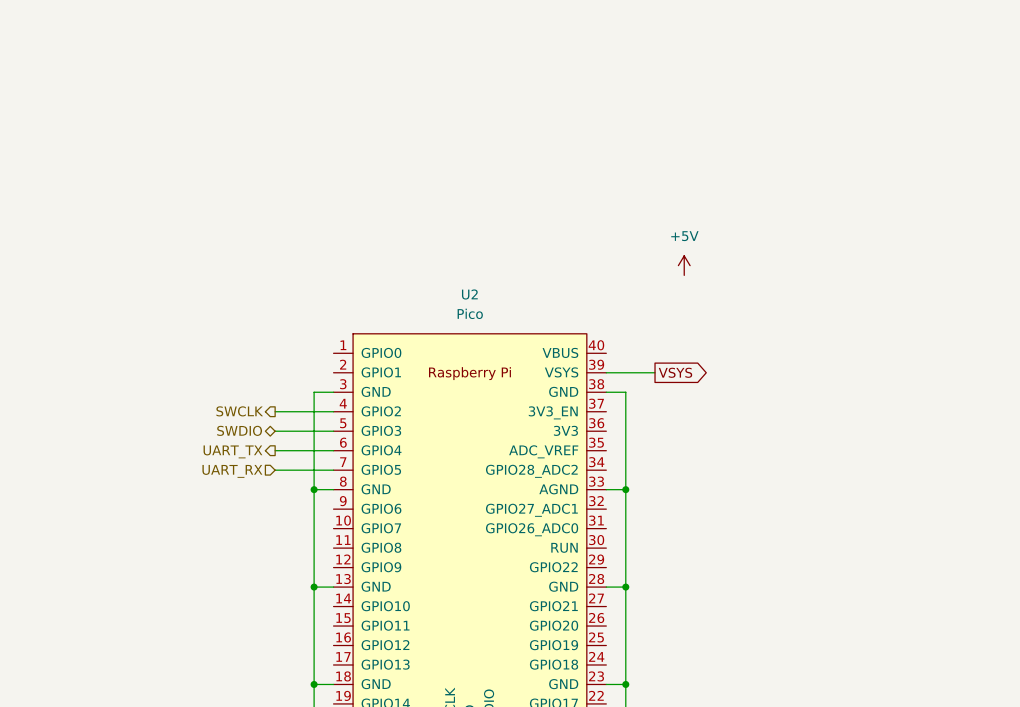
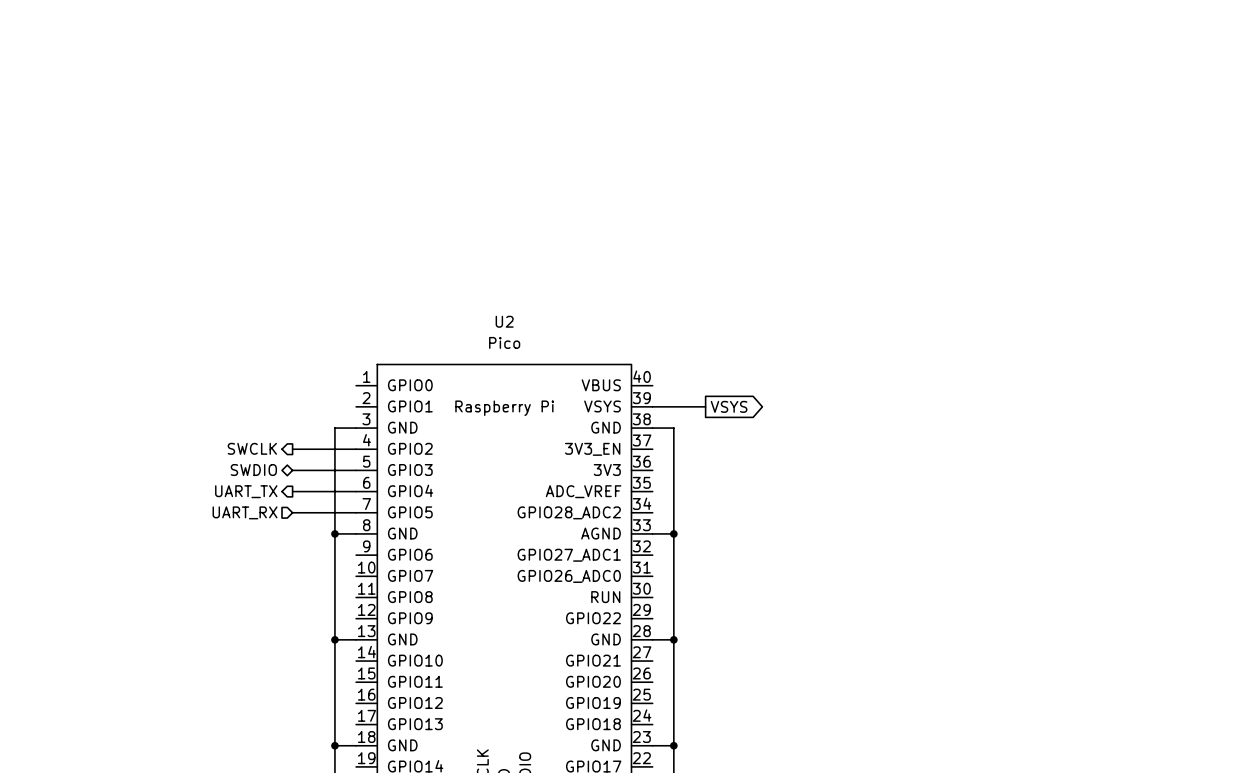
power symbol: +5V (684, 265) -> none

